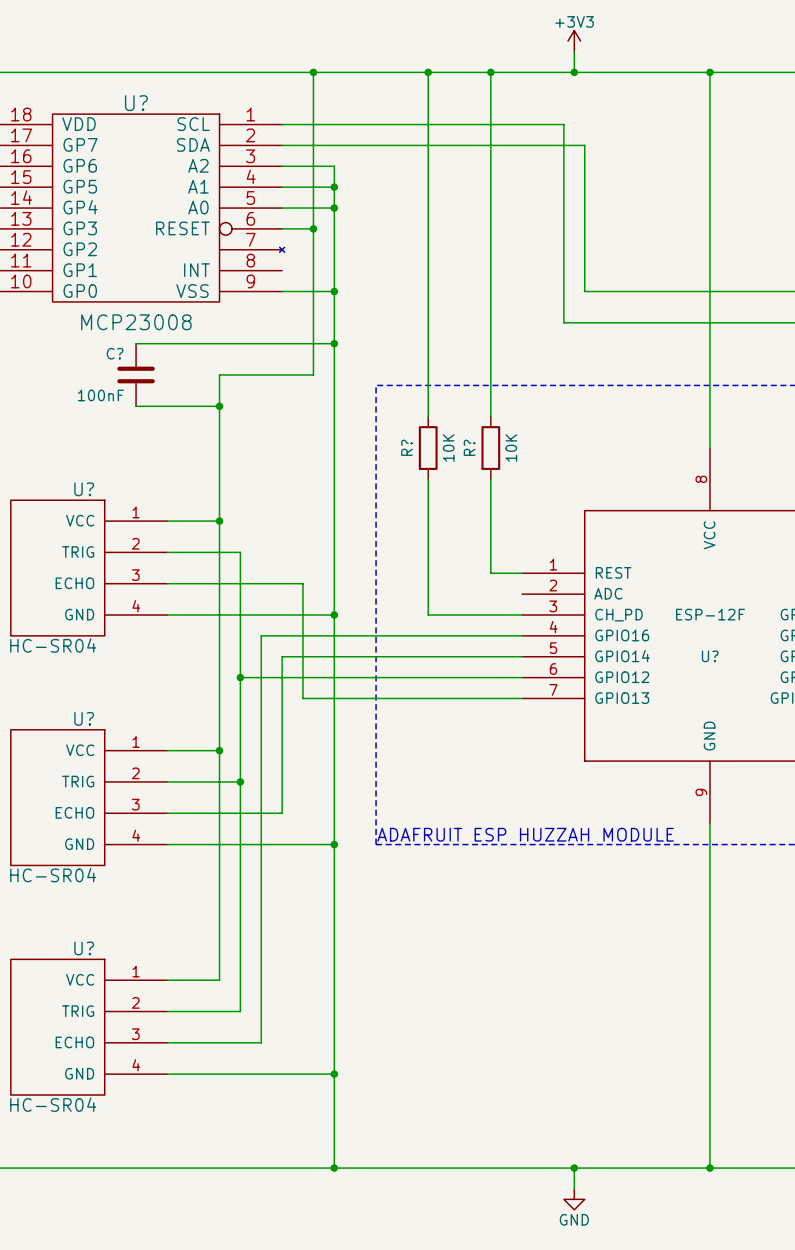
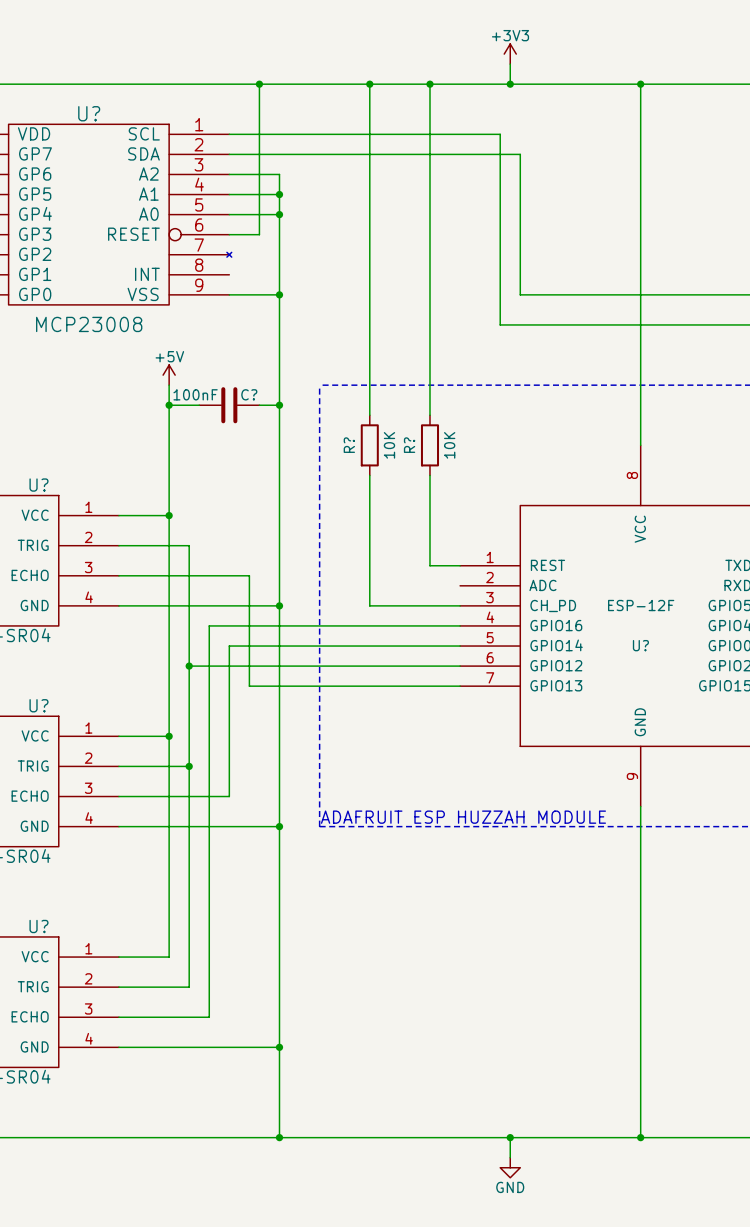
wire: (313, 228) (313, 375) (219, 375) (219, 385) -> none
junction: (313, 228) -> none
wire: (136, 343) (334, 343) -> none
junction: (334, 343) -> none
C? rotation: 0° (136, 375) -> 90° clockwise (229, 405)
C? position: (136, 375) -> (229, 405)
power symbol: none -> +5V (169, 375)
C? value position: 100nF (100, 395) -> 100nF (195, 394)
wire: (136, 406) (219, 406) -> (199, 405) (169, 405)
wire: none -> (259, 405) (279, 405)
junction: none -> (279, 405)

